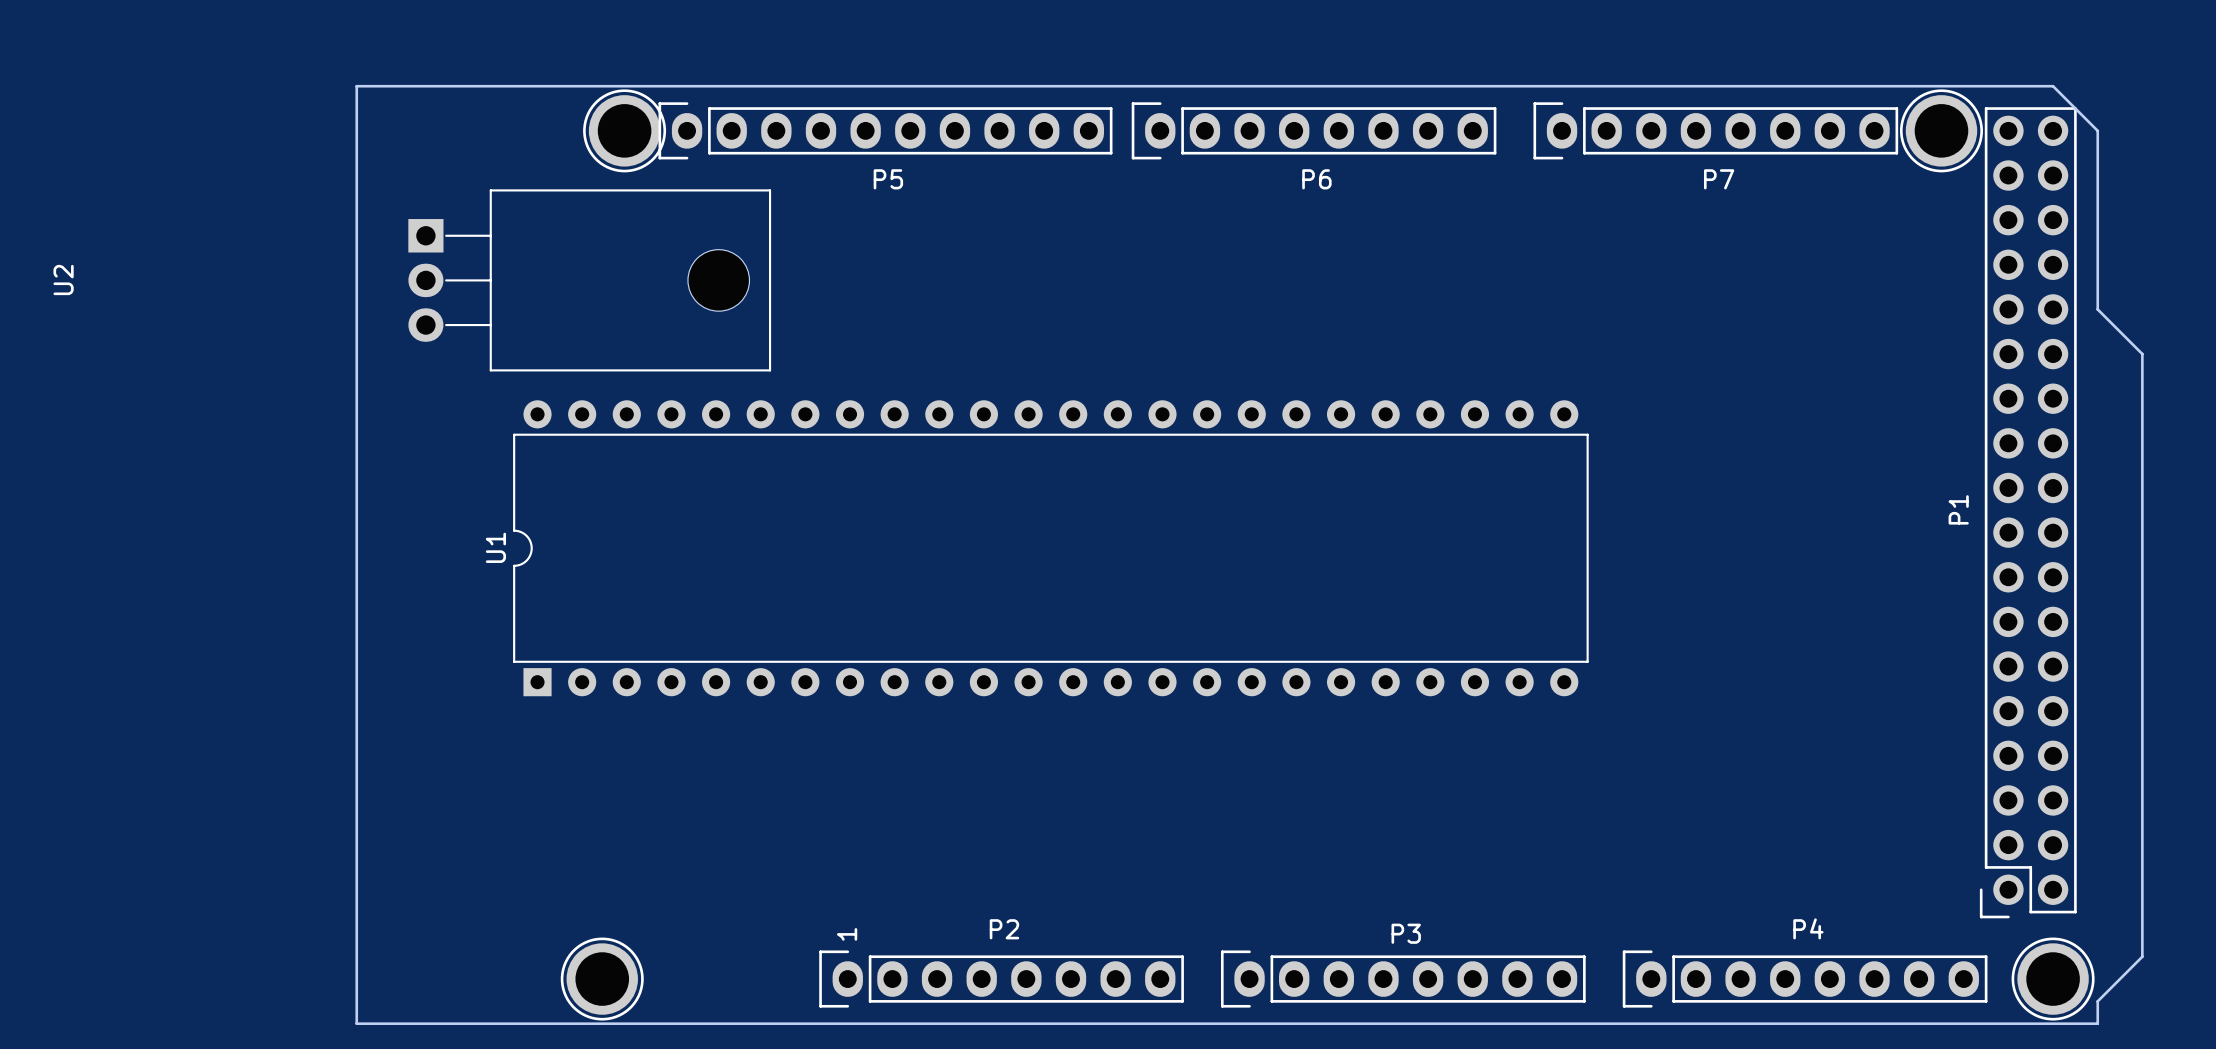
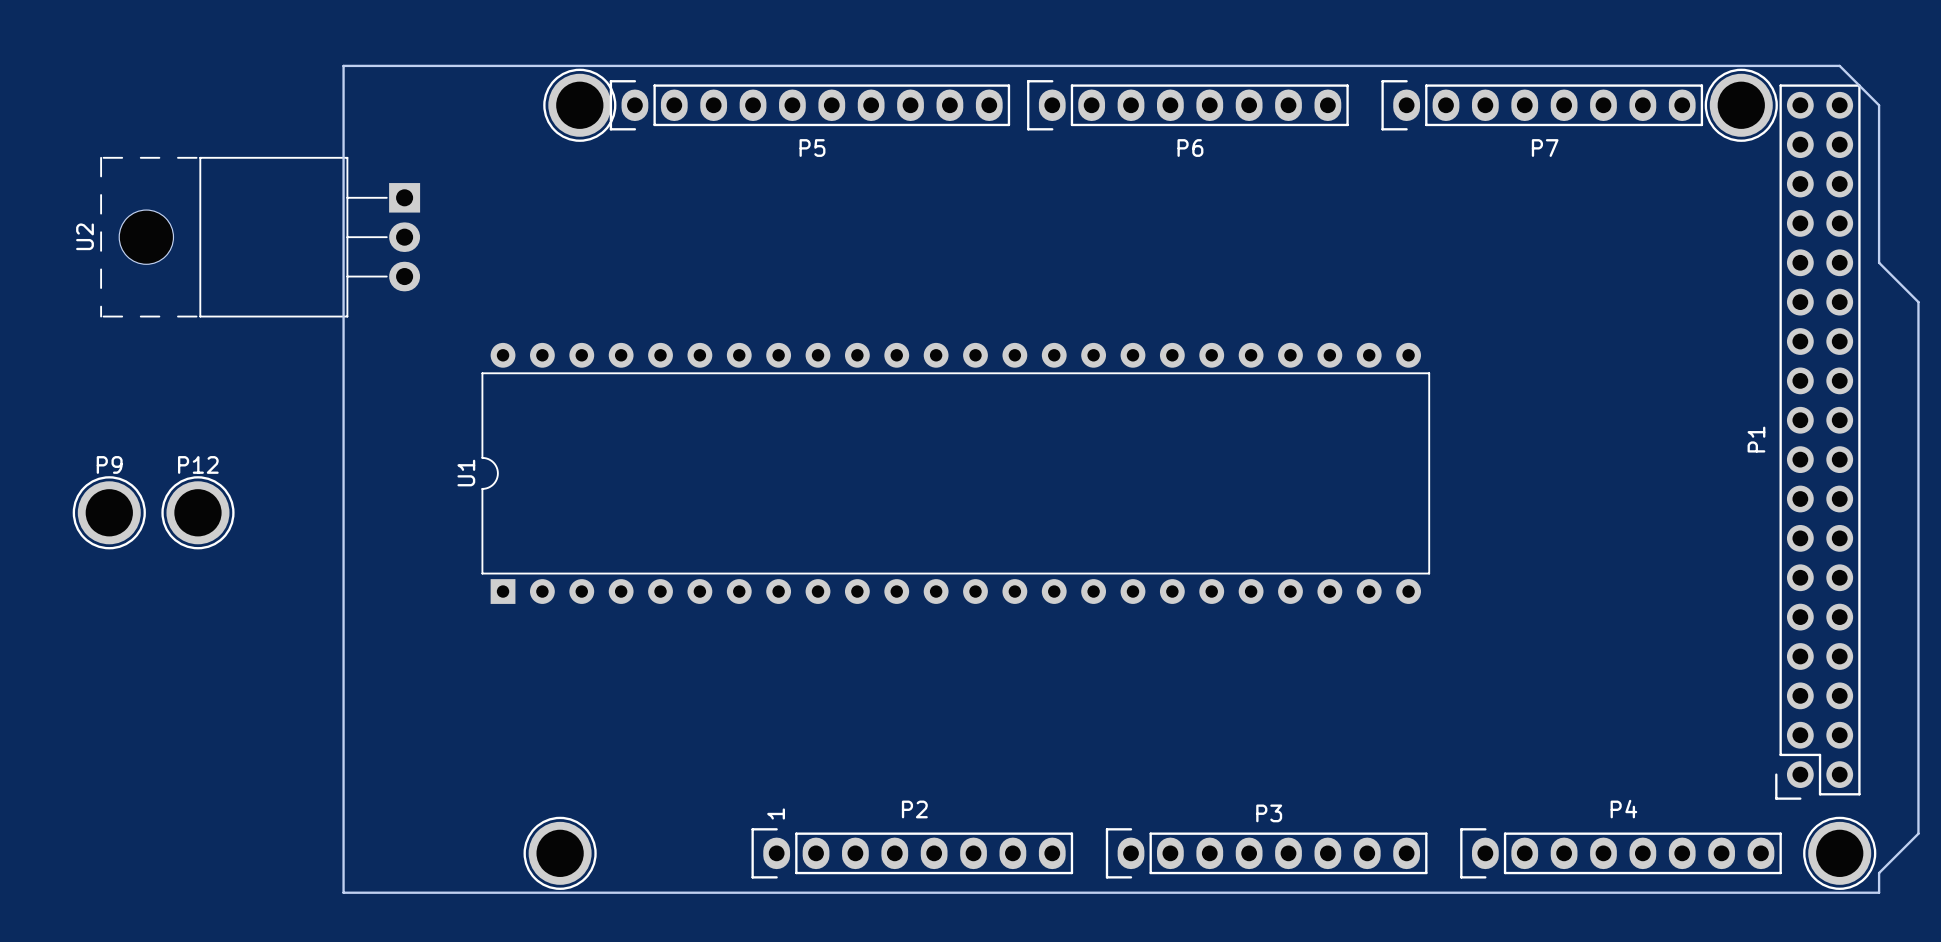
U2 footprint: [408, 189, 772, 372] -> [100, 156, 421, 318]
P9: none -> (109, 512)
P12: none -> (197, 512)

